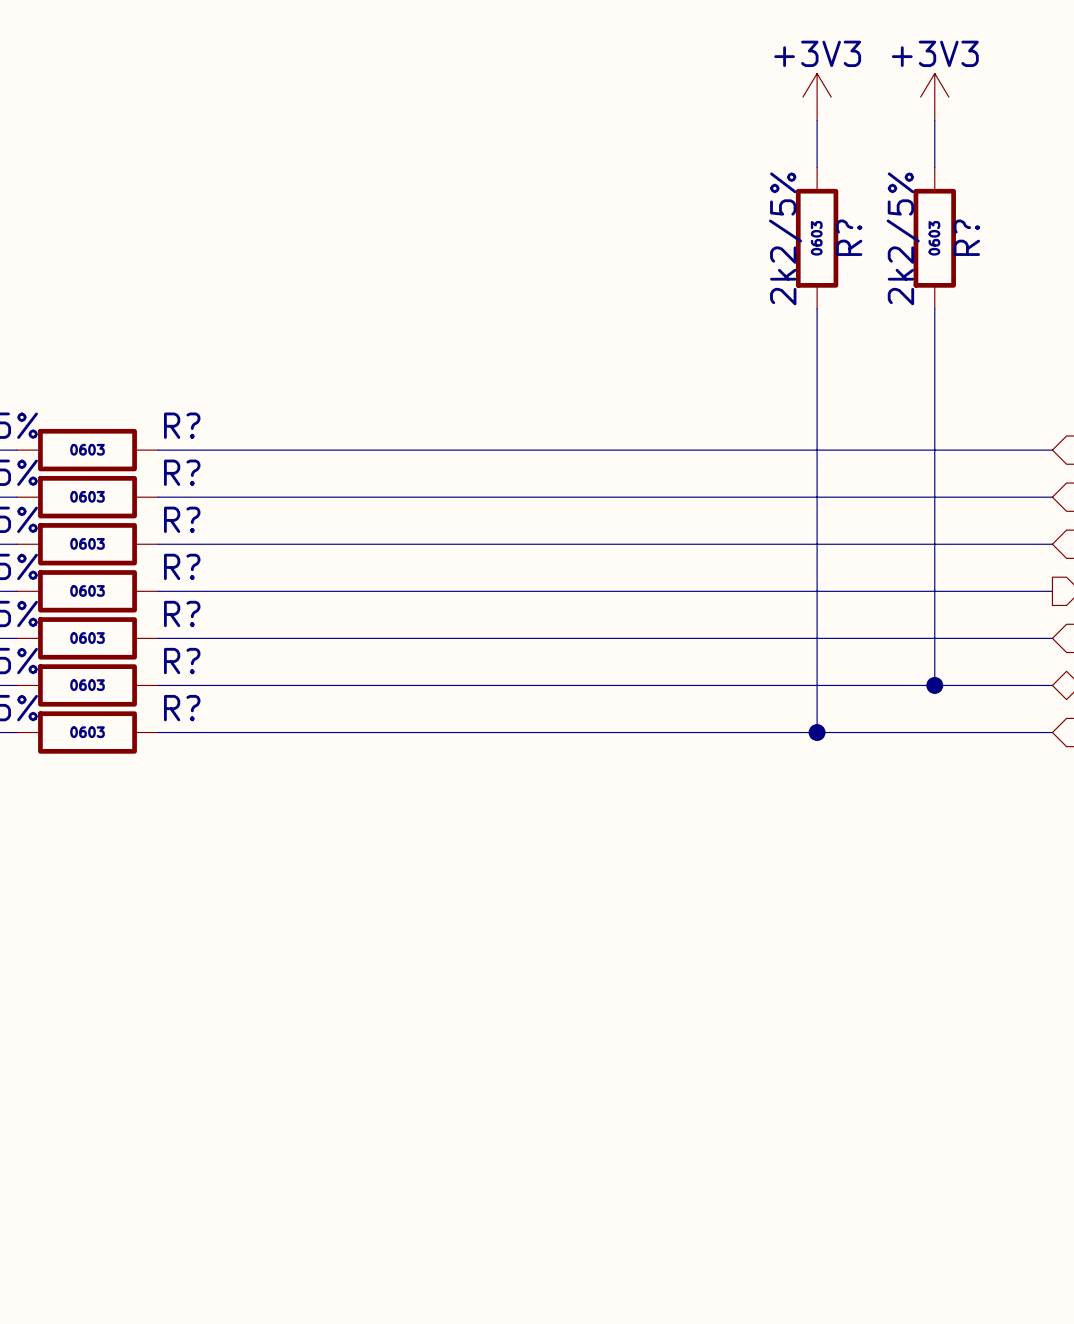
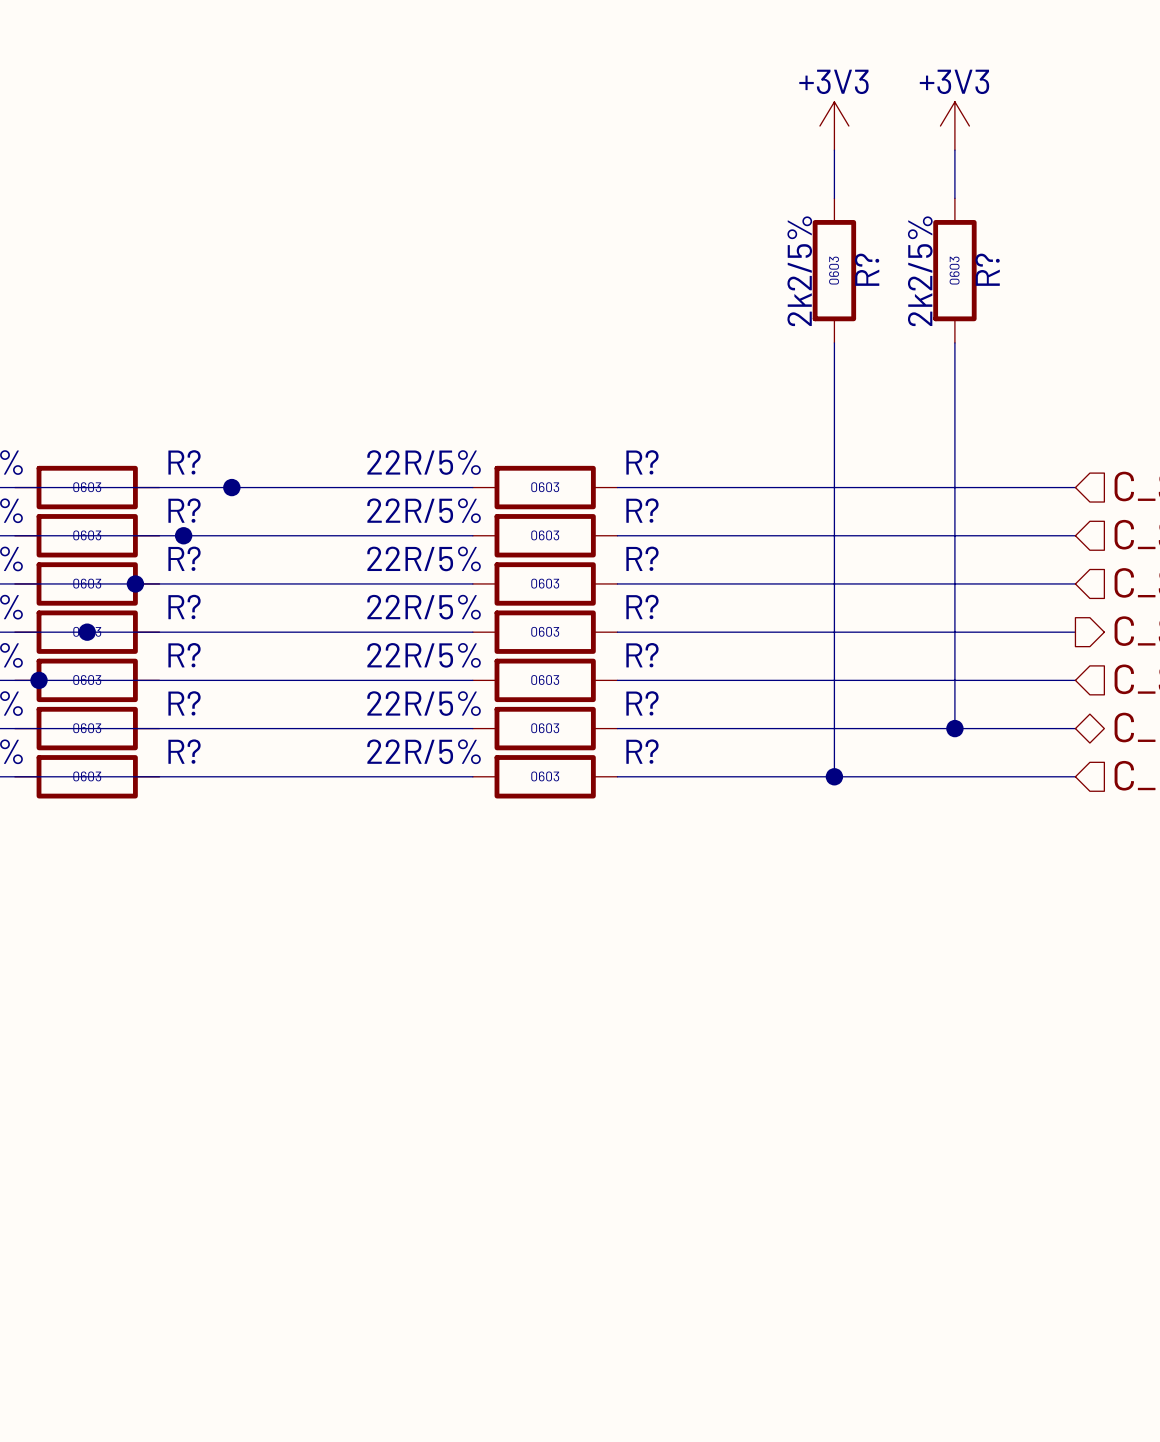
junction: none -> (231, 487)
wire: (464, 450) (605, 450) -> (14, 487) (159, 487)
R?: none -> 22R/5% (545, 487)
junction: none -> (183, 535)
wire: (464, 497) (605, 497) -> (14, 535) (159, 535)
R?: none -> 22R/5% (545, 535)
junction: none -> (135, 583)
wire: (464, 544) (605, 544) -> (14, 583) (159, 583)
R?: none -> 22R/5% (545, 583)
junction: none -> (87, 632)
wire: (464, 591) (605, 591) -> (14, 632) (159, 632)
R?: none -> 22R/5% (545, 632)
junction: none -> (39, 680)
wire: (464, 638) (605, 638) -> (14, 680) (159, 680)
R?: none -> 22R/5% (545, 680)
wire: (464, 685) (605, 685) -> (14, 728) (159, 728)
R?: none -> 22R/5% (545, 728)
wire: (464, 732) (605, 732) -> (14, 776) (159, 776)
R?: none -> 22R/5% (545, 776)

